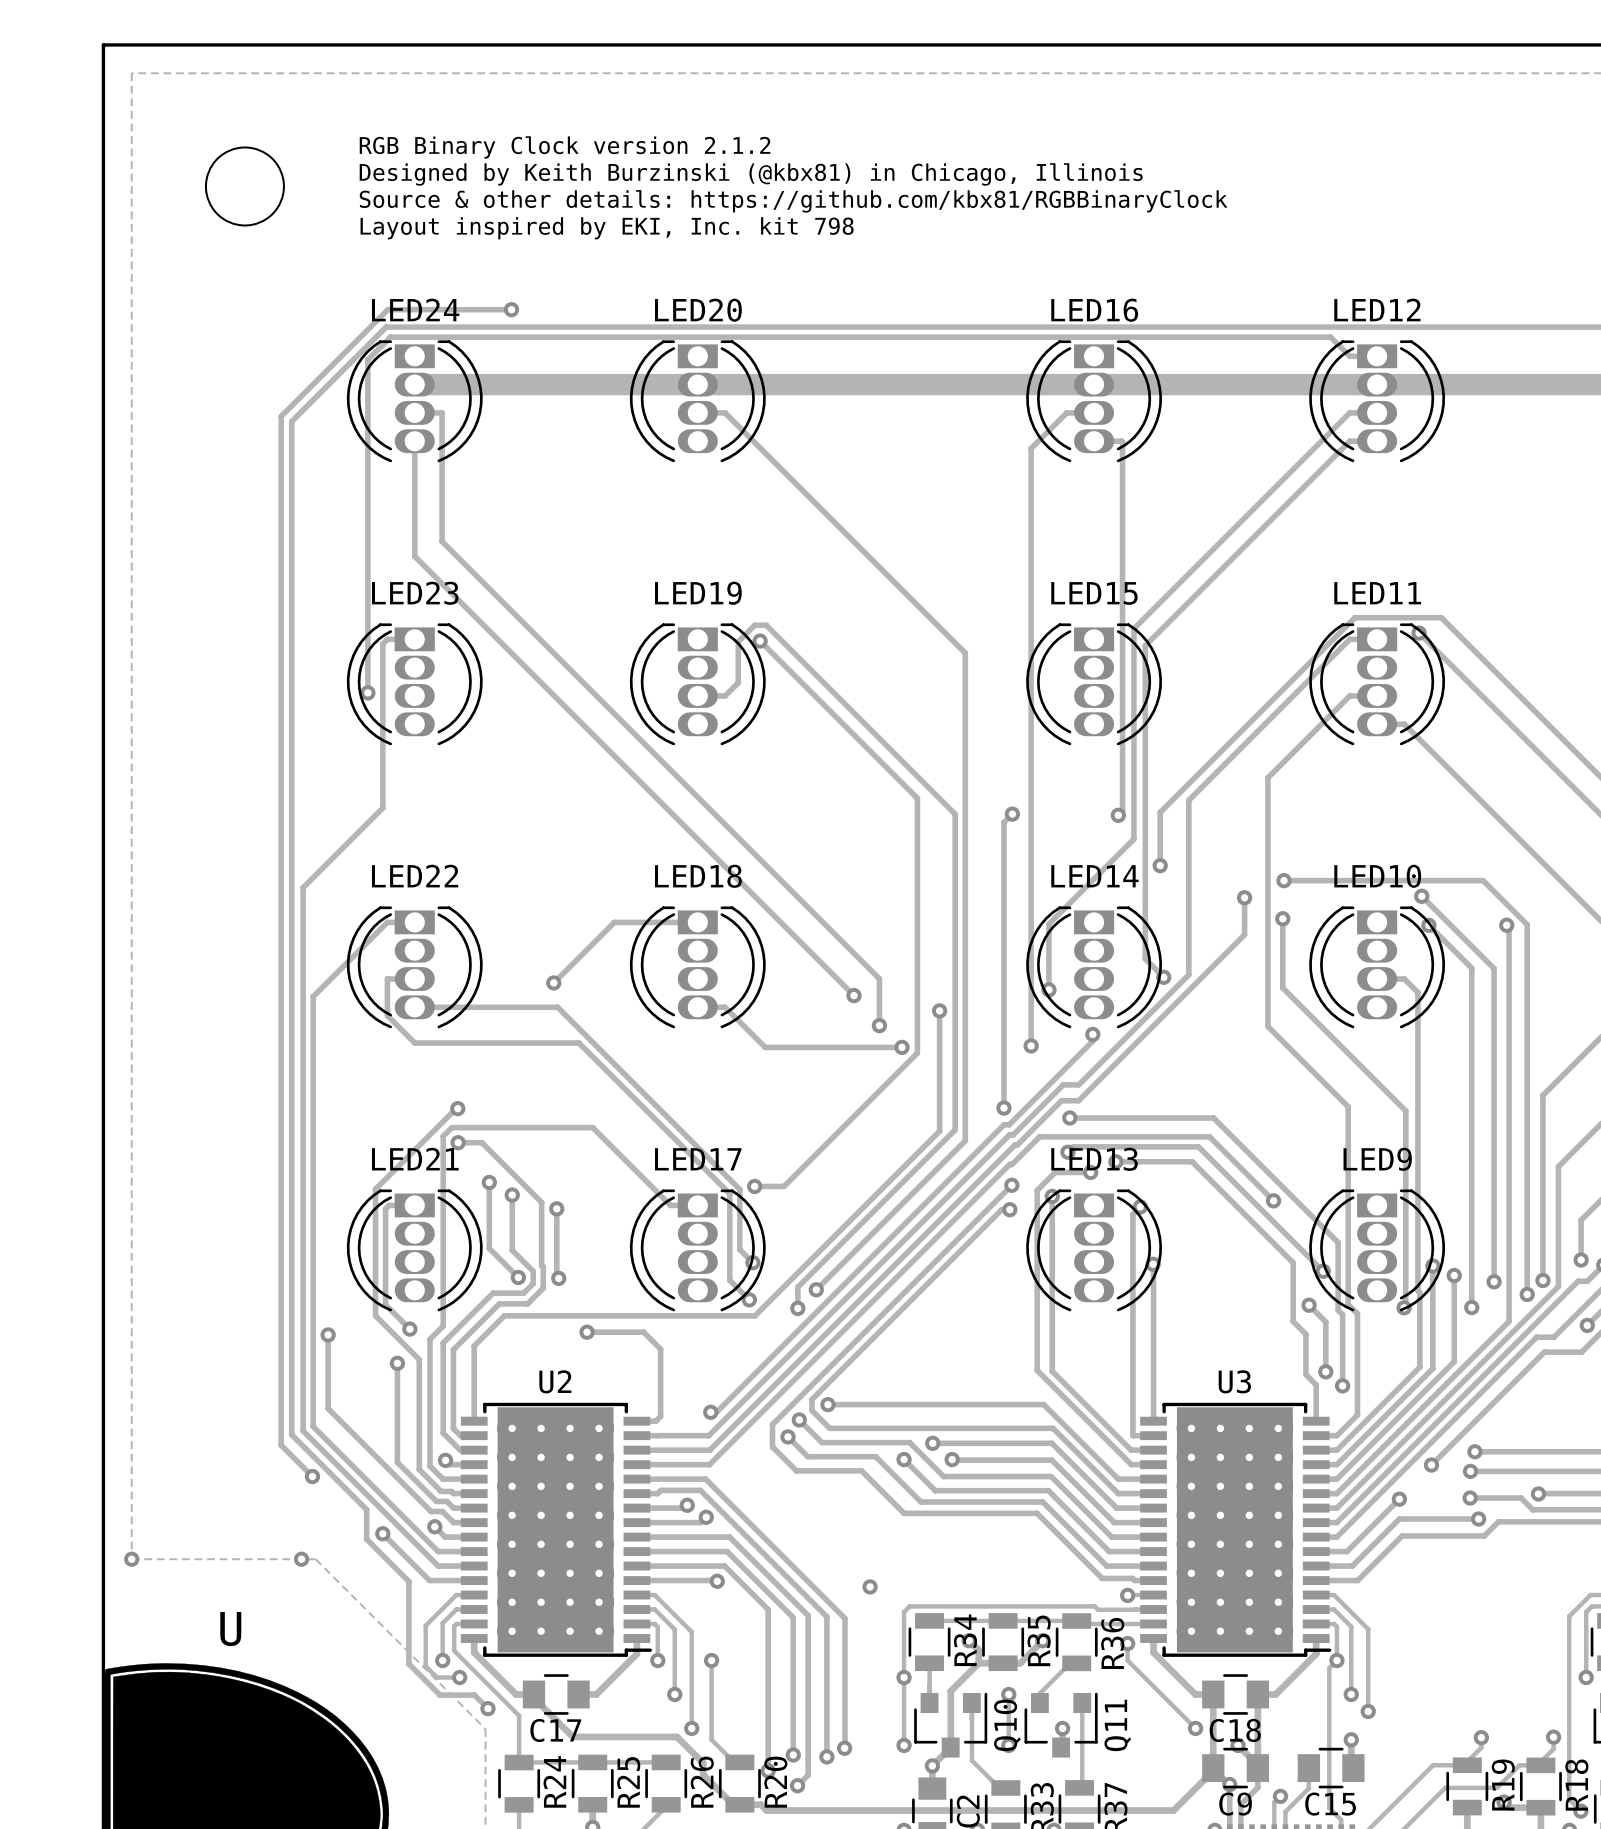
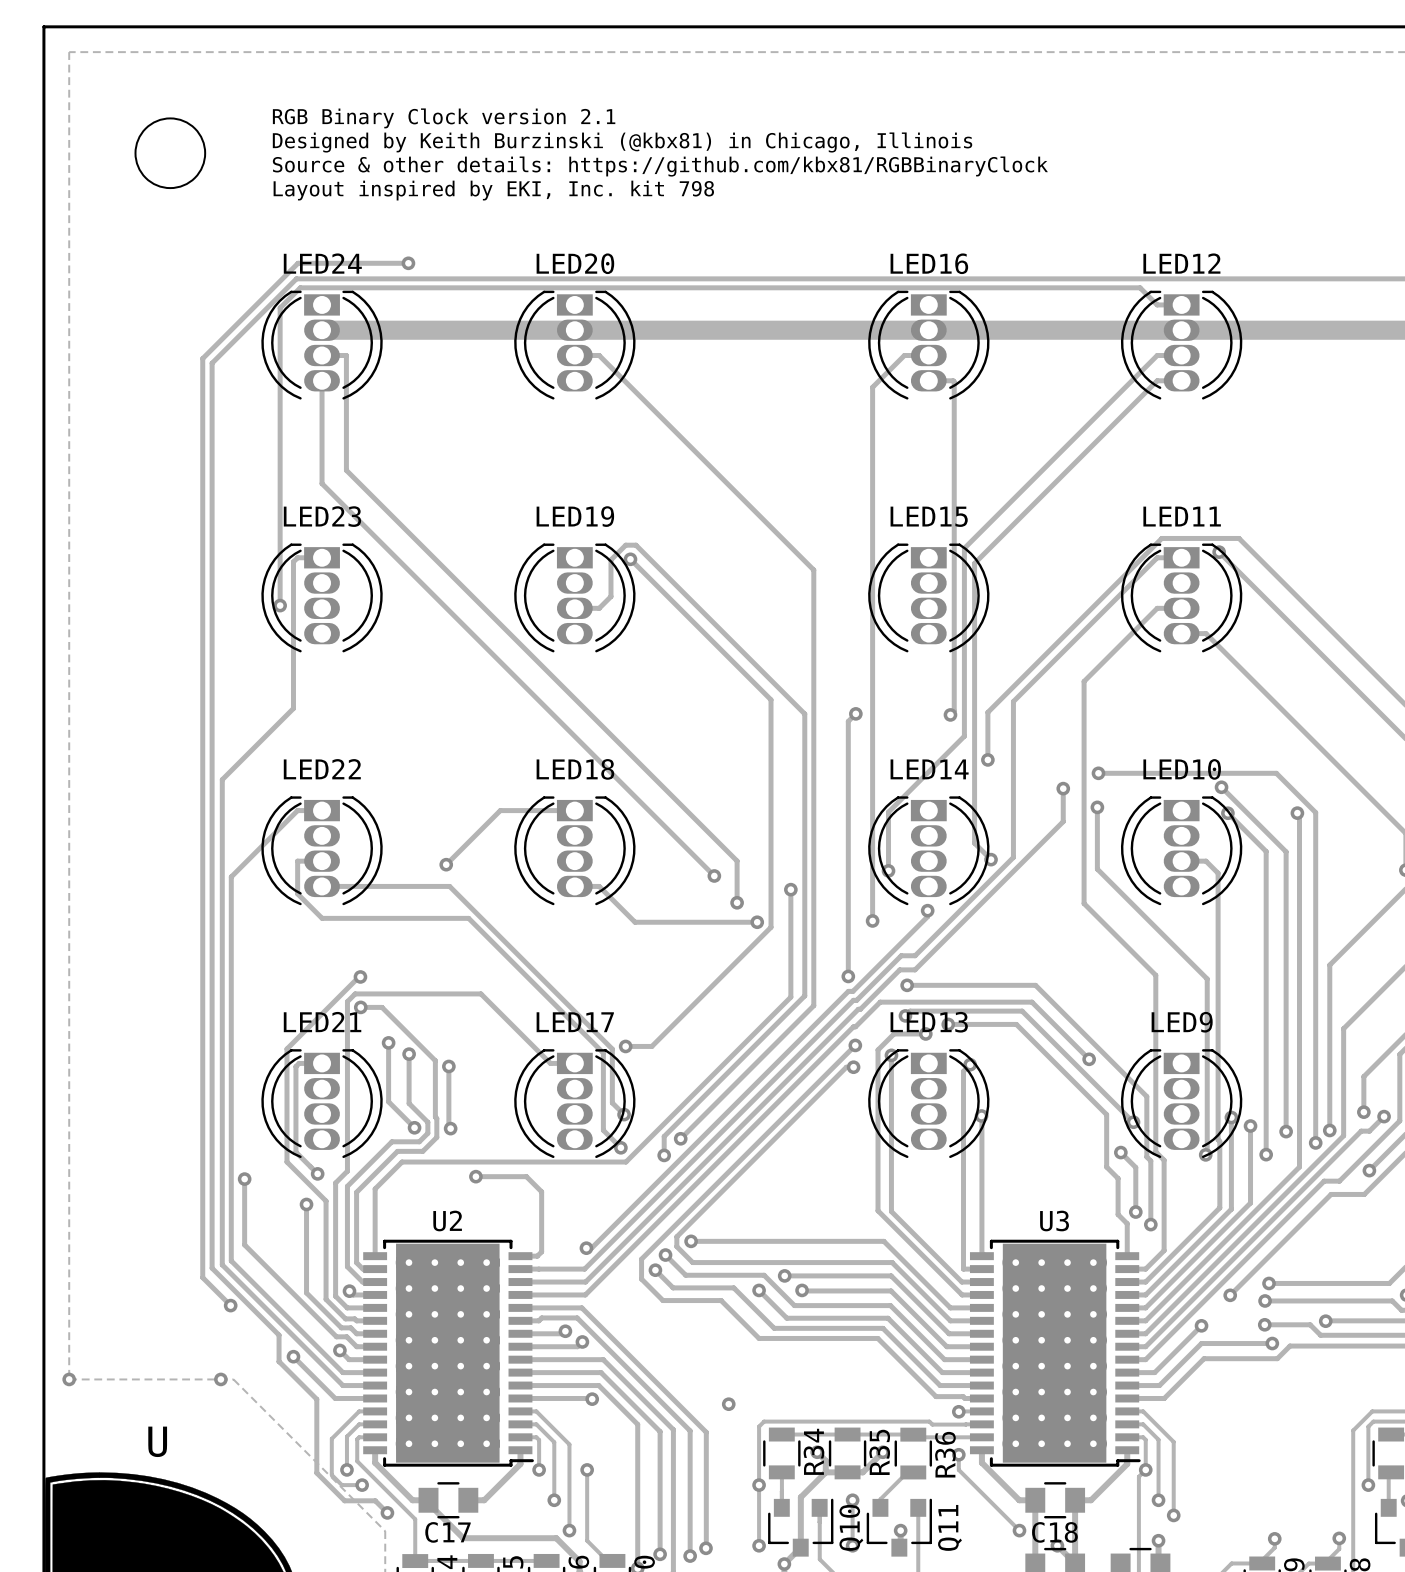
text: RGB Binary Clock version 2.1.2 (565, 147) -> RGB Binary Clock version 2.1 (444, 118)

